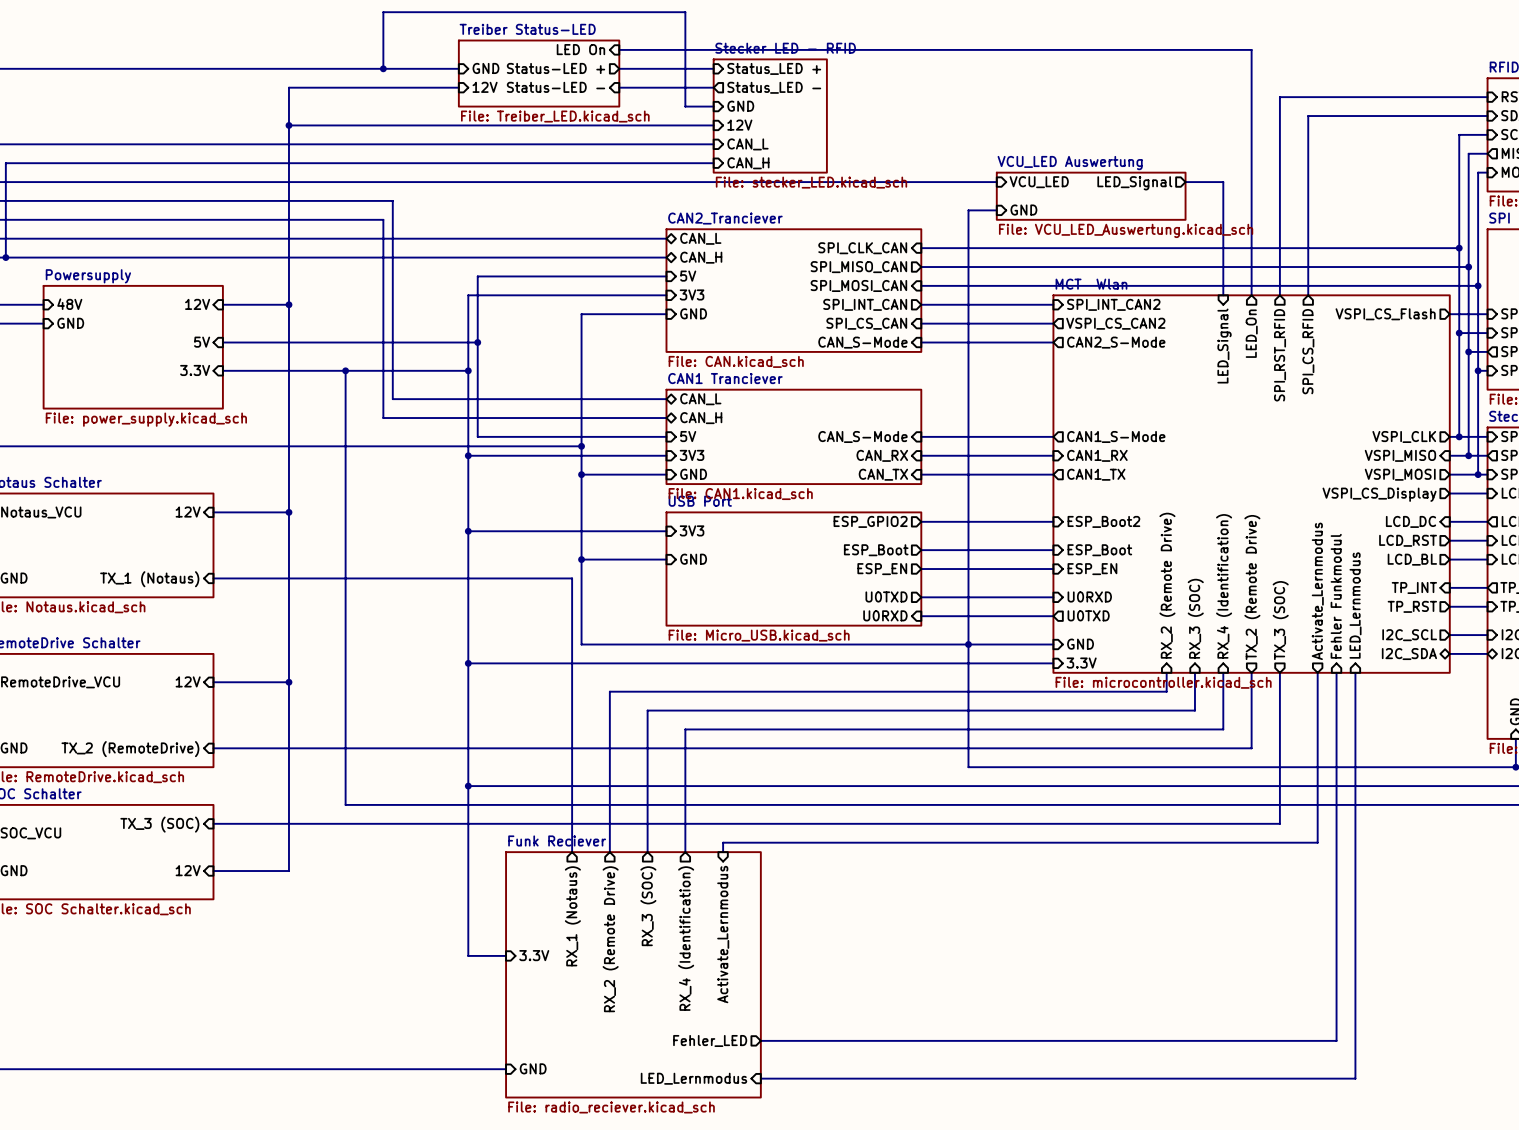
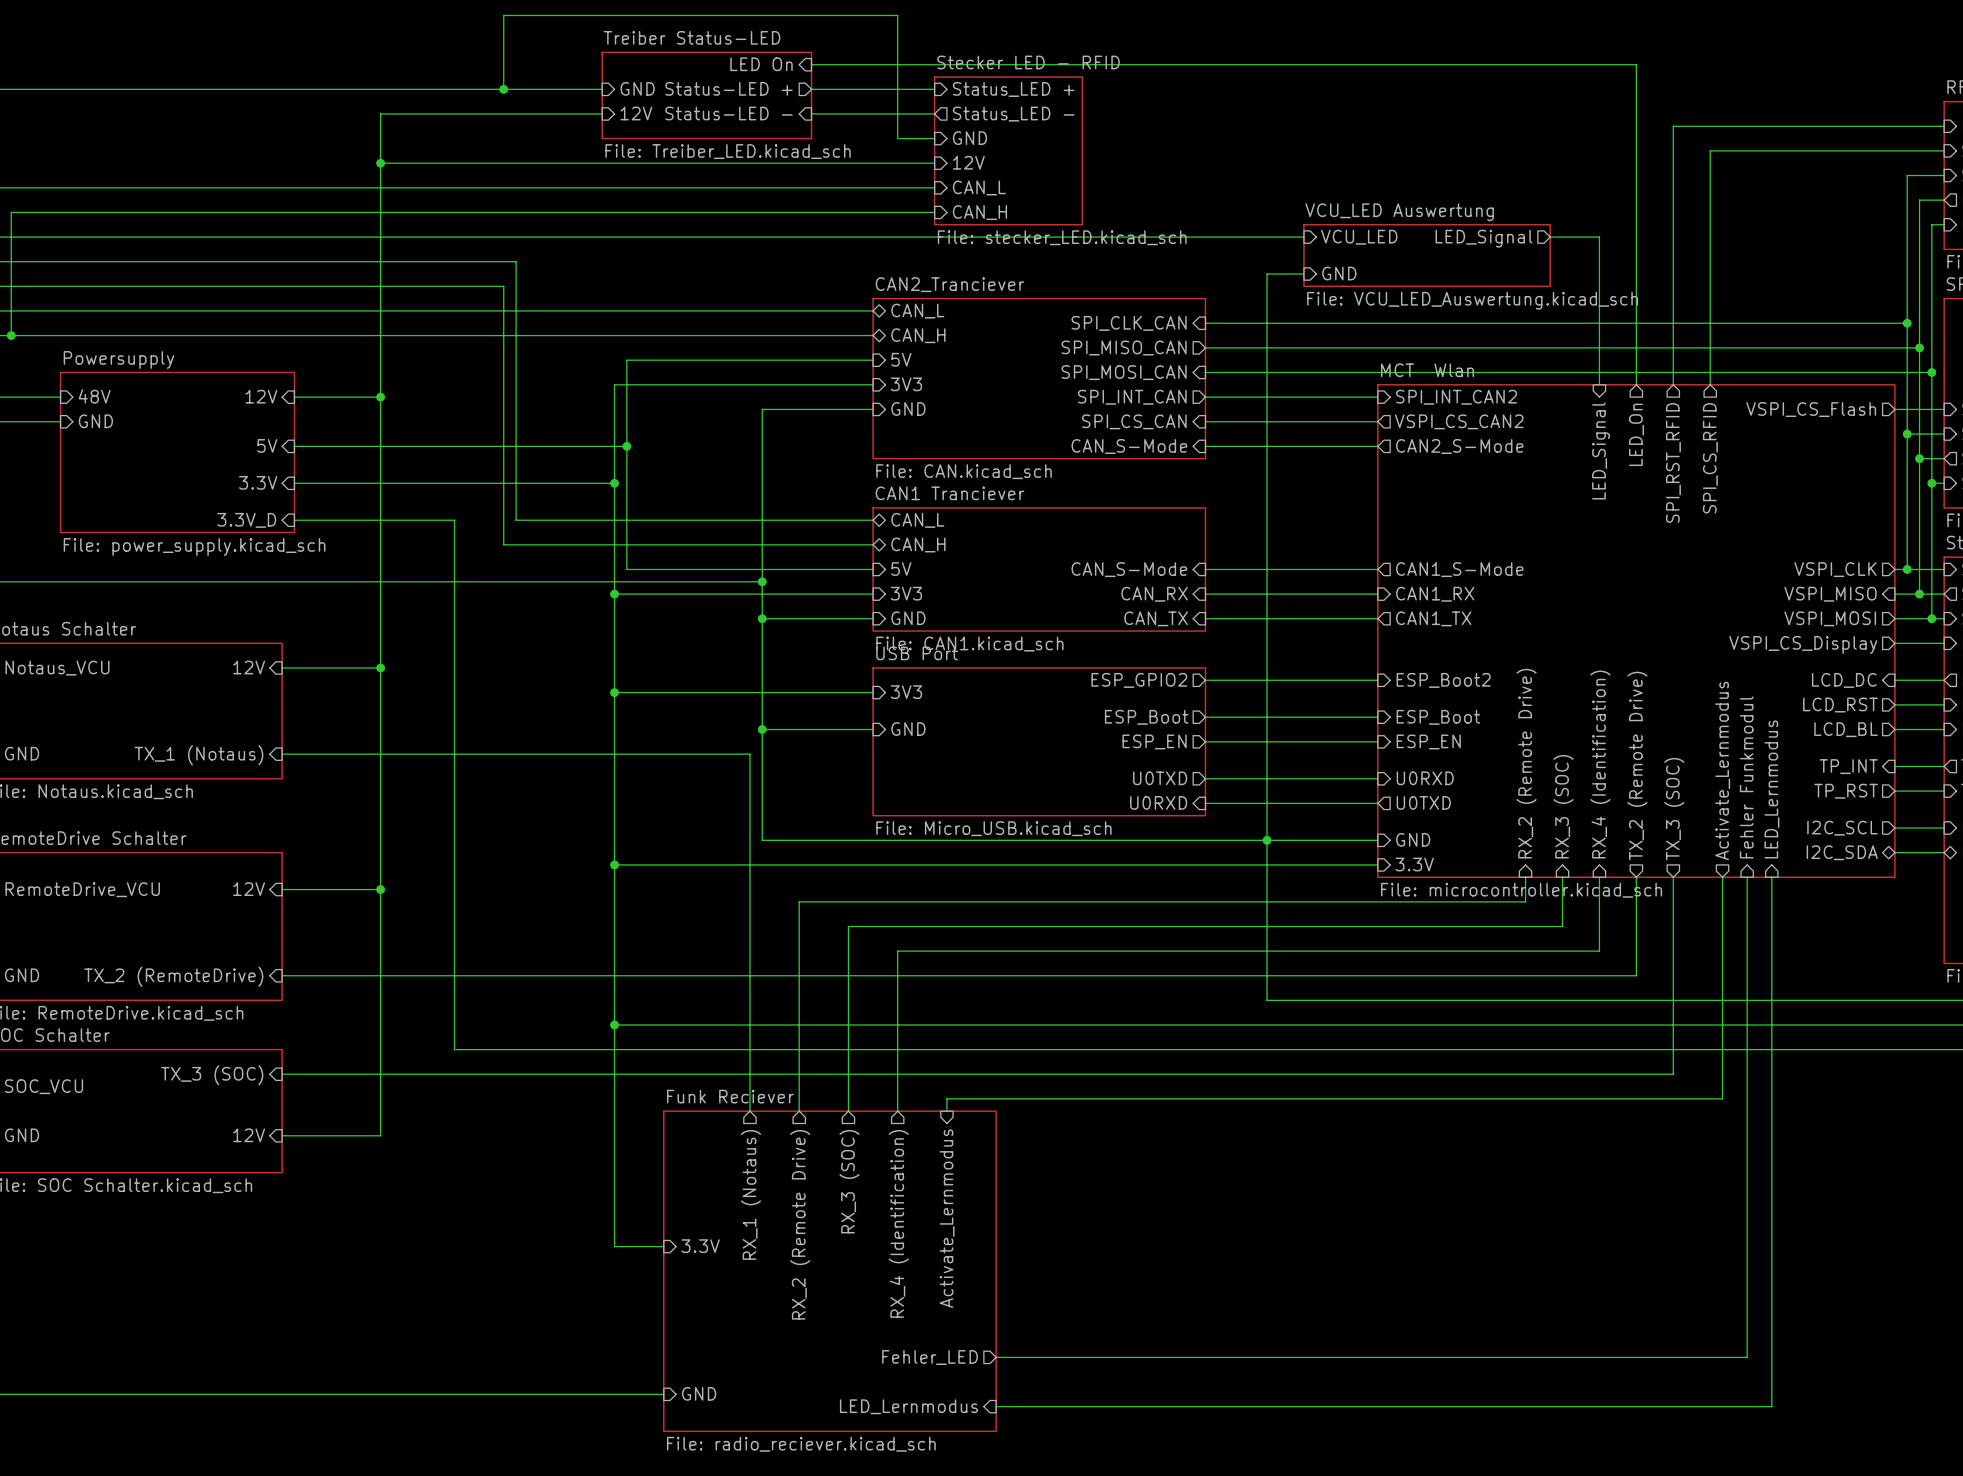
wire: (345, 370) (345, 399) -> (294, 520) (454, 520)
junction: (345, 370) -> none
sheet pin: none -> 3.3V_D (246, 520)

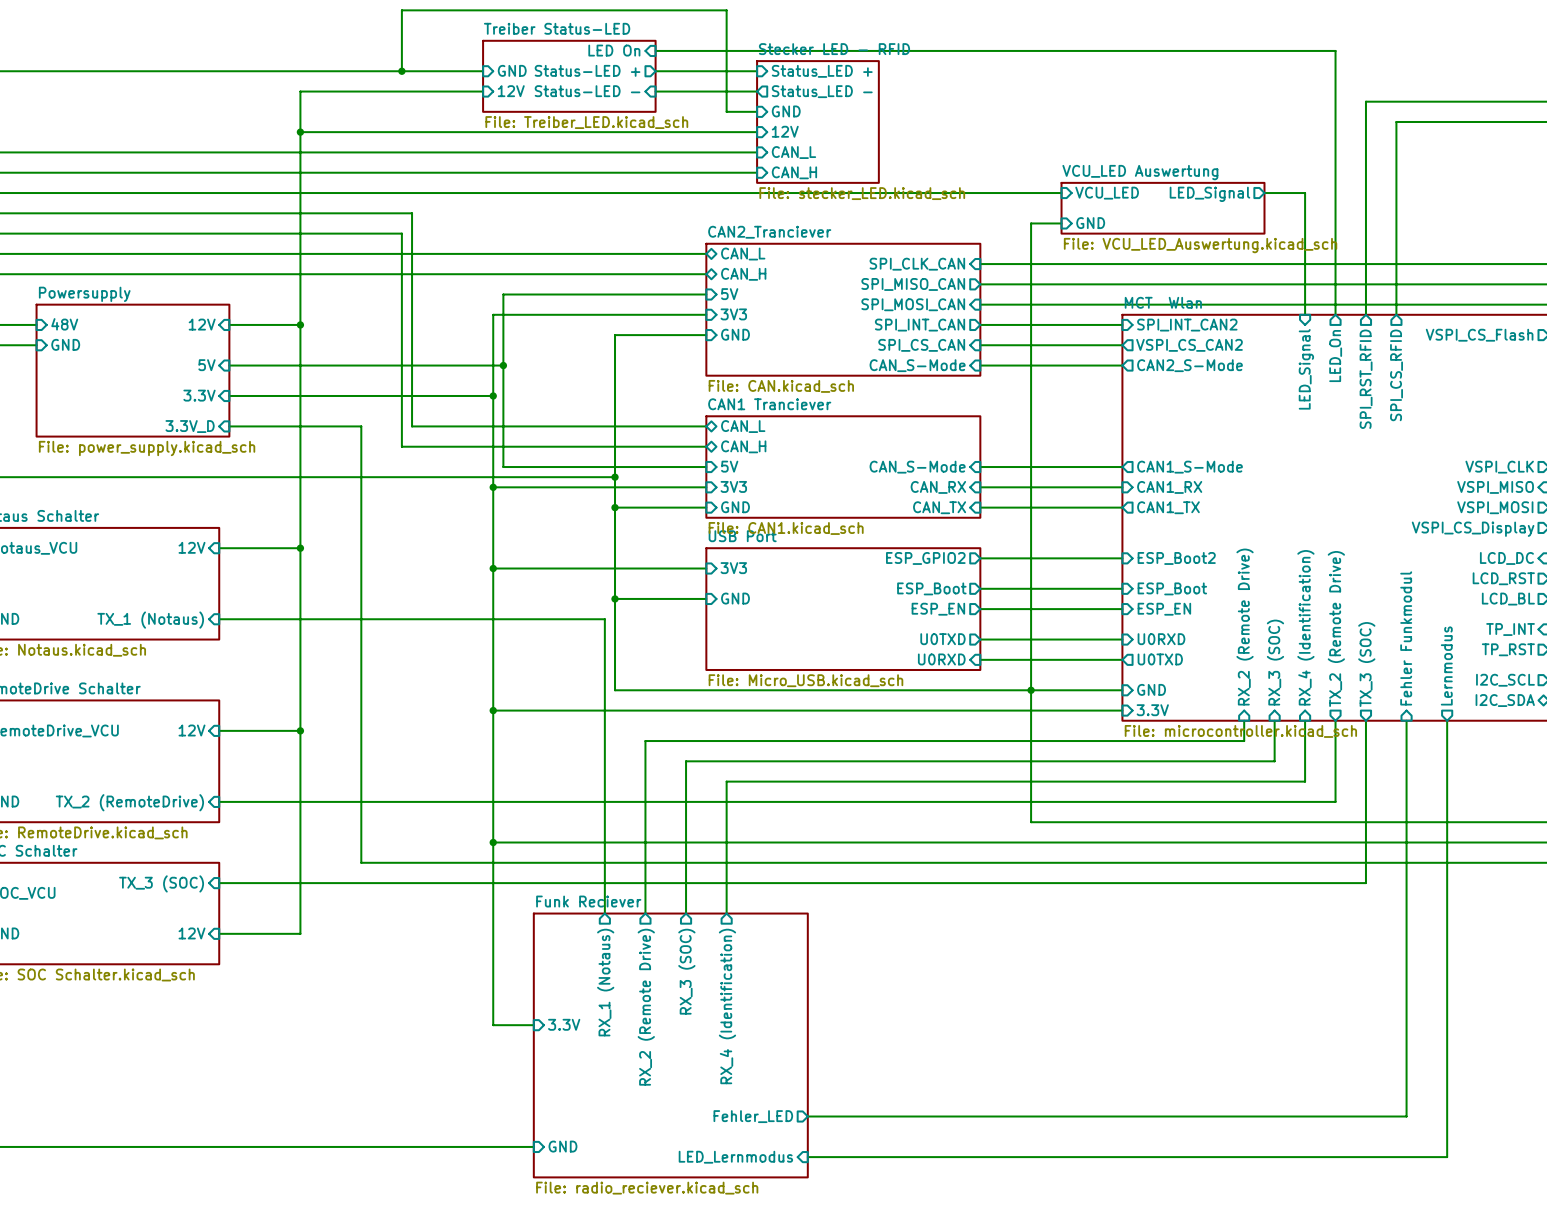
sheet pin shape: output (1722, 770) -> input (1406, 638)
sheet pin: Activate_Lernmodus (1722, 770) -> Fehler Funkmodul (1406, 638)
sheet pin: Fehler Funkmodul (1746, 777) -> none
sheet pin shape: input (1771, 789) -> output (1446, 665)
sheet pin: LED_Lernmodus (1771, 789) -> Lernmodus (1446, 665)
wire: (1747, 877) (1747, 1357) (1722, 1357) -> (1406, 903) (1406, 1116)
wire: (1722, 1098) (946, 1098) (946, 1111) -> none
sheet pin: Activate_Lernmodus (947, 1218) -> none

